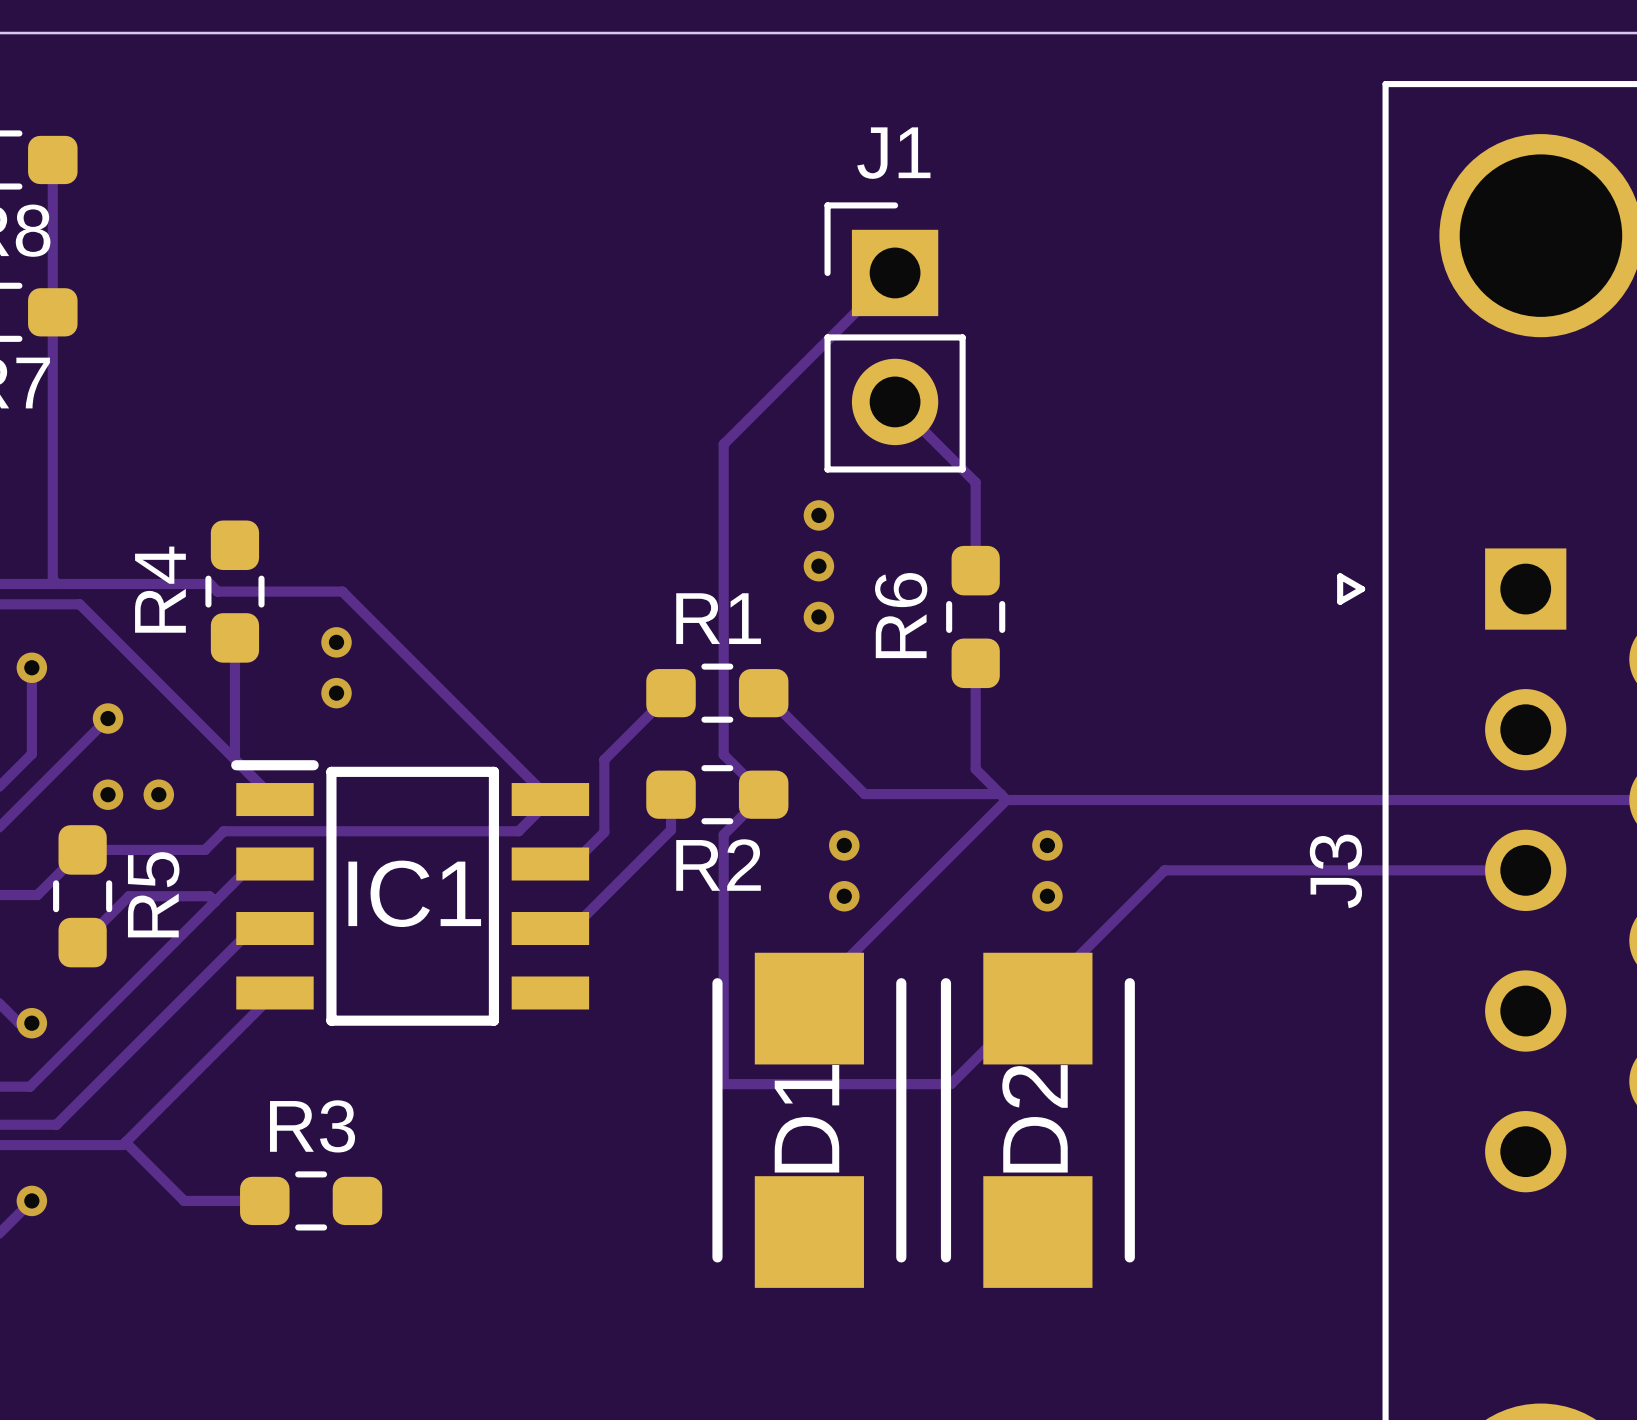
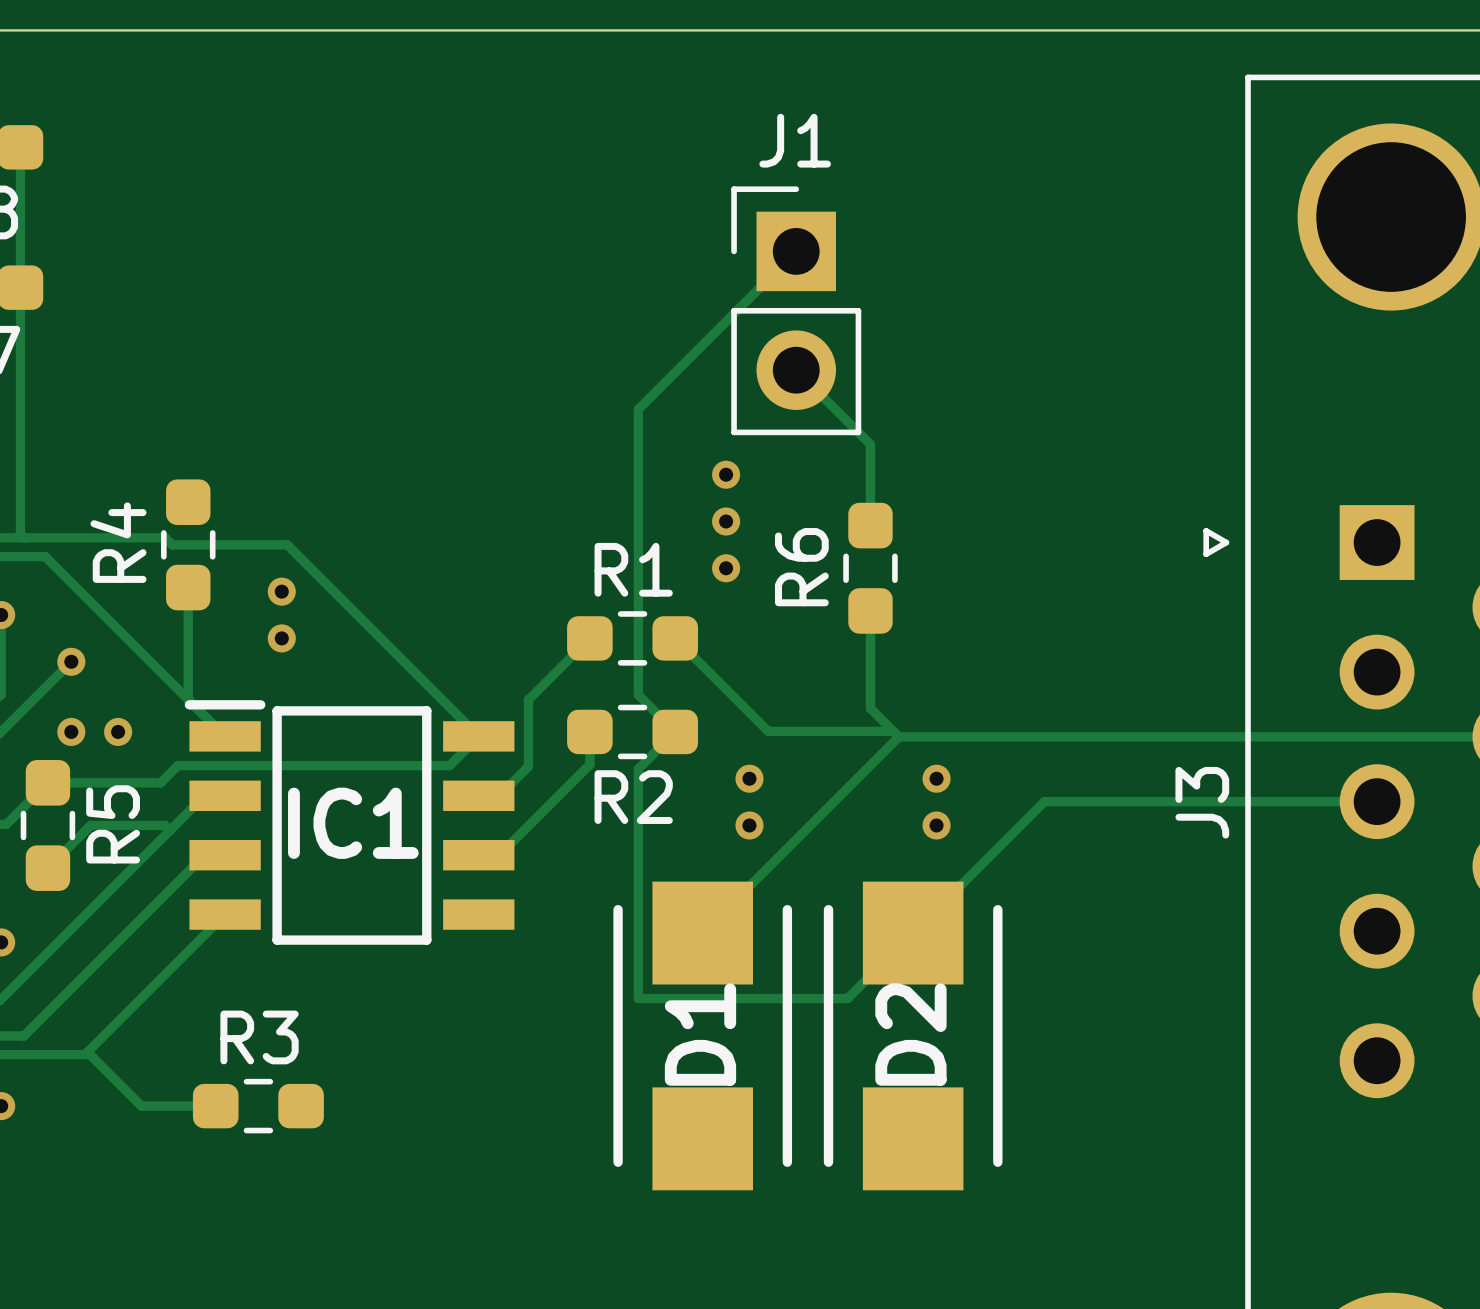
D1 position: (809, 1120) -> (702, 1035)
D2 position: (1037, 1120) -> (913, 1035)

